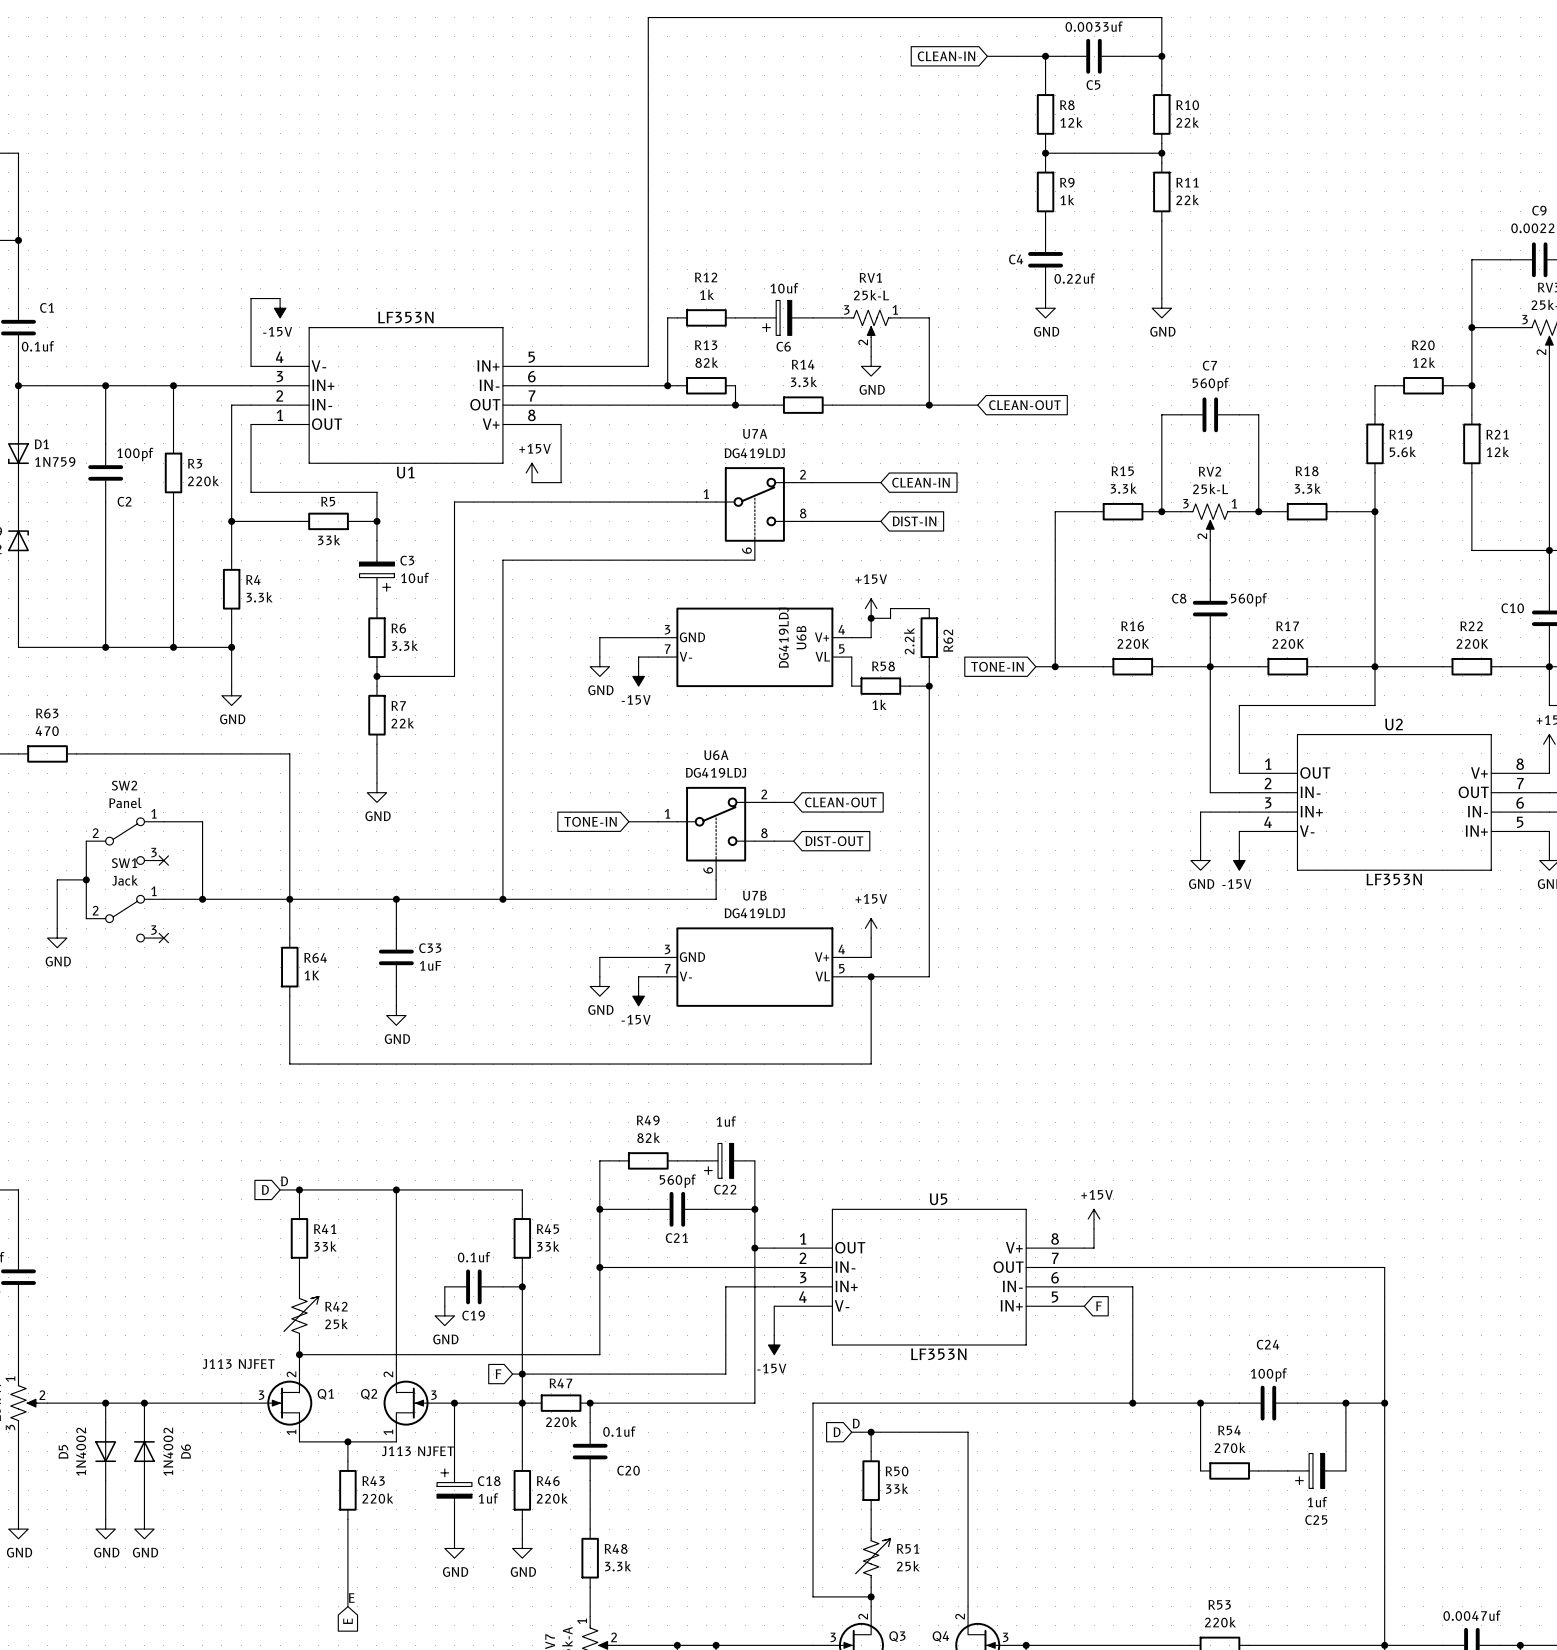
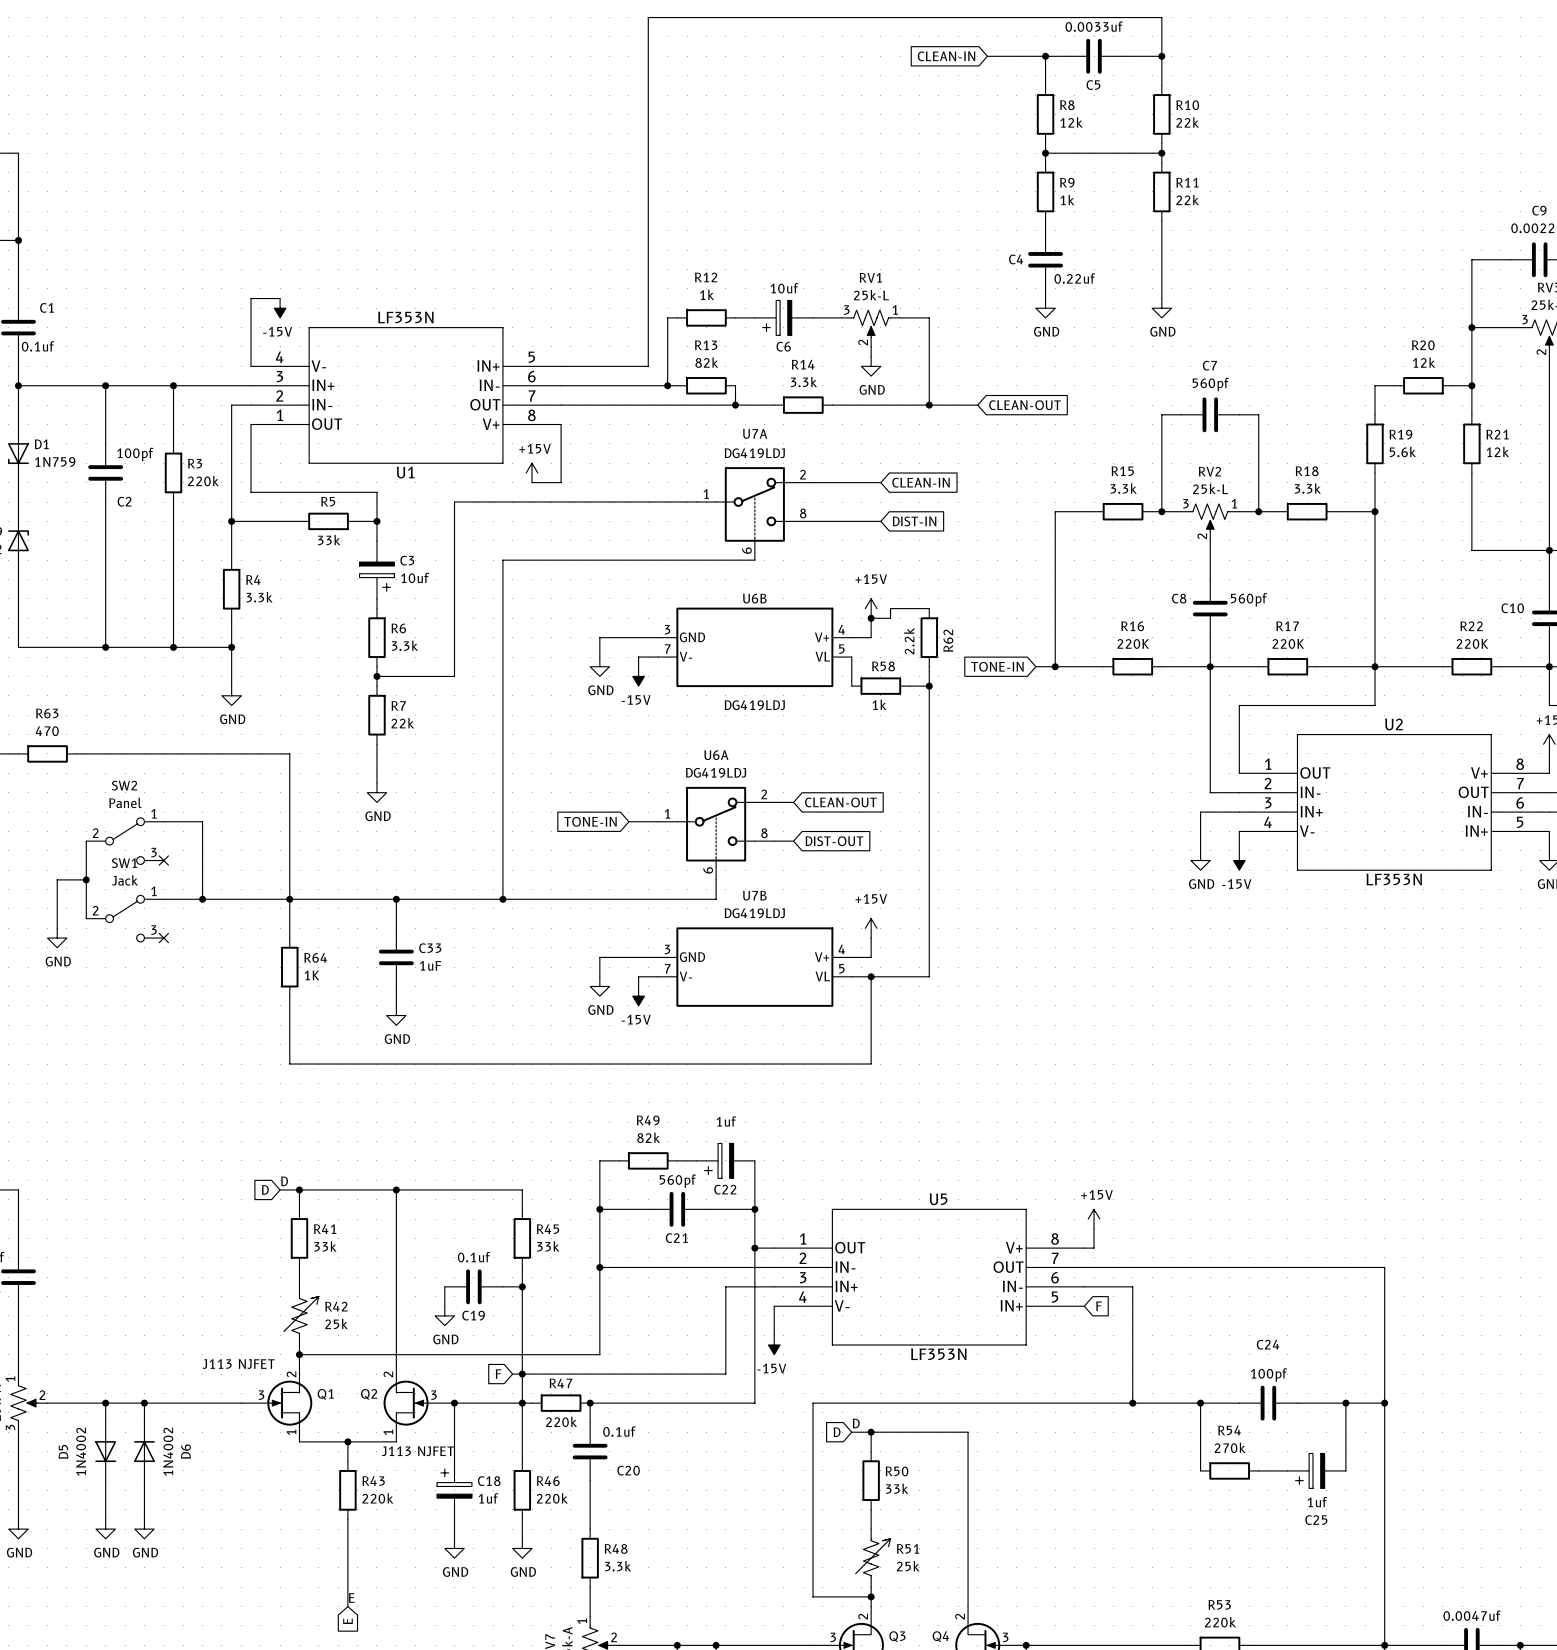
U6B value rotation: 0° (783, 637) -> 90° clockwise (754, 705)
U6B name rotation: 0° (801, 637) -> 90° clockwise (754, 598)
U6B name position: U6B (801, 637) -> U6B (754, 598)

